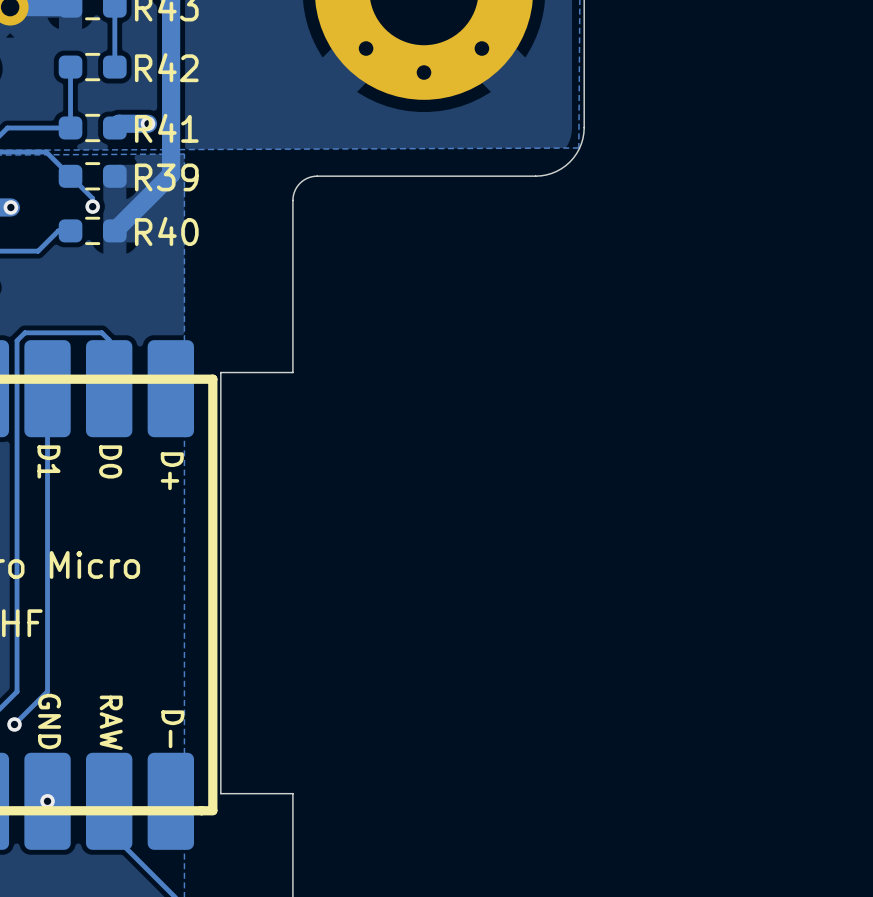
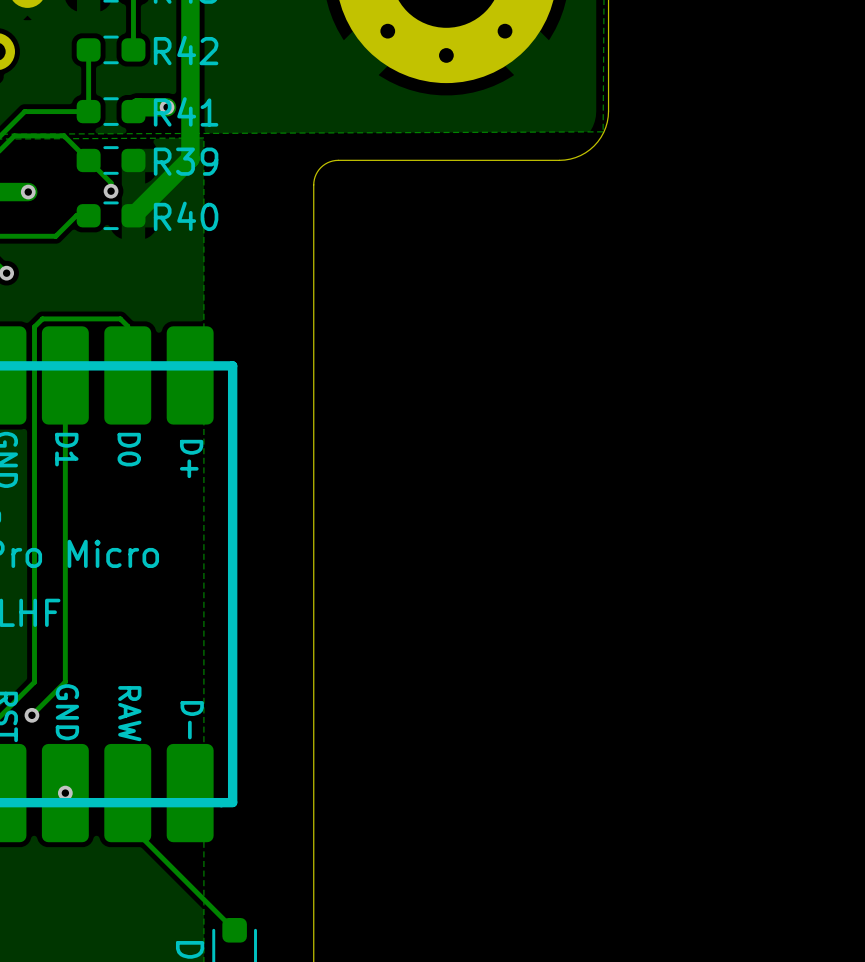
board edge: (292, 372) (220, 372) (220, 793) (292, 793) -> (313, 359) (313, 785)

